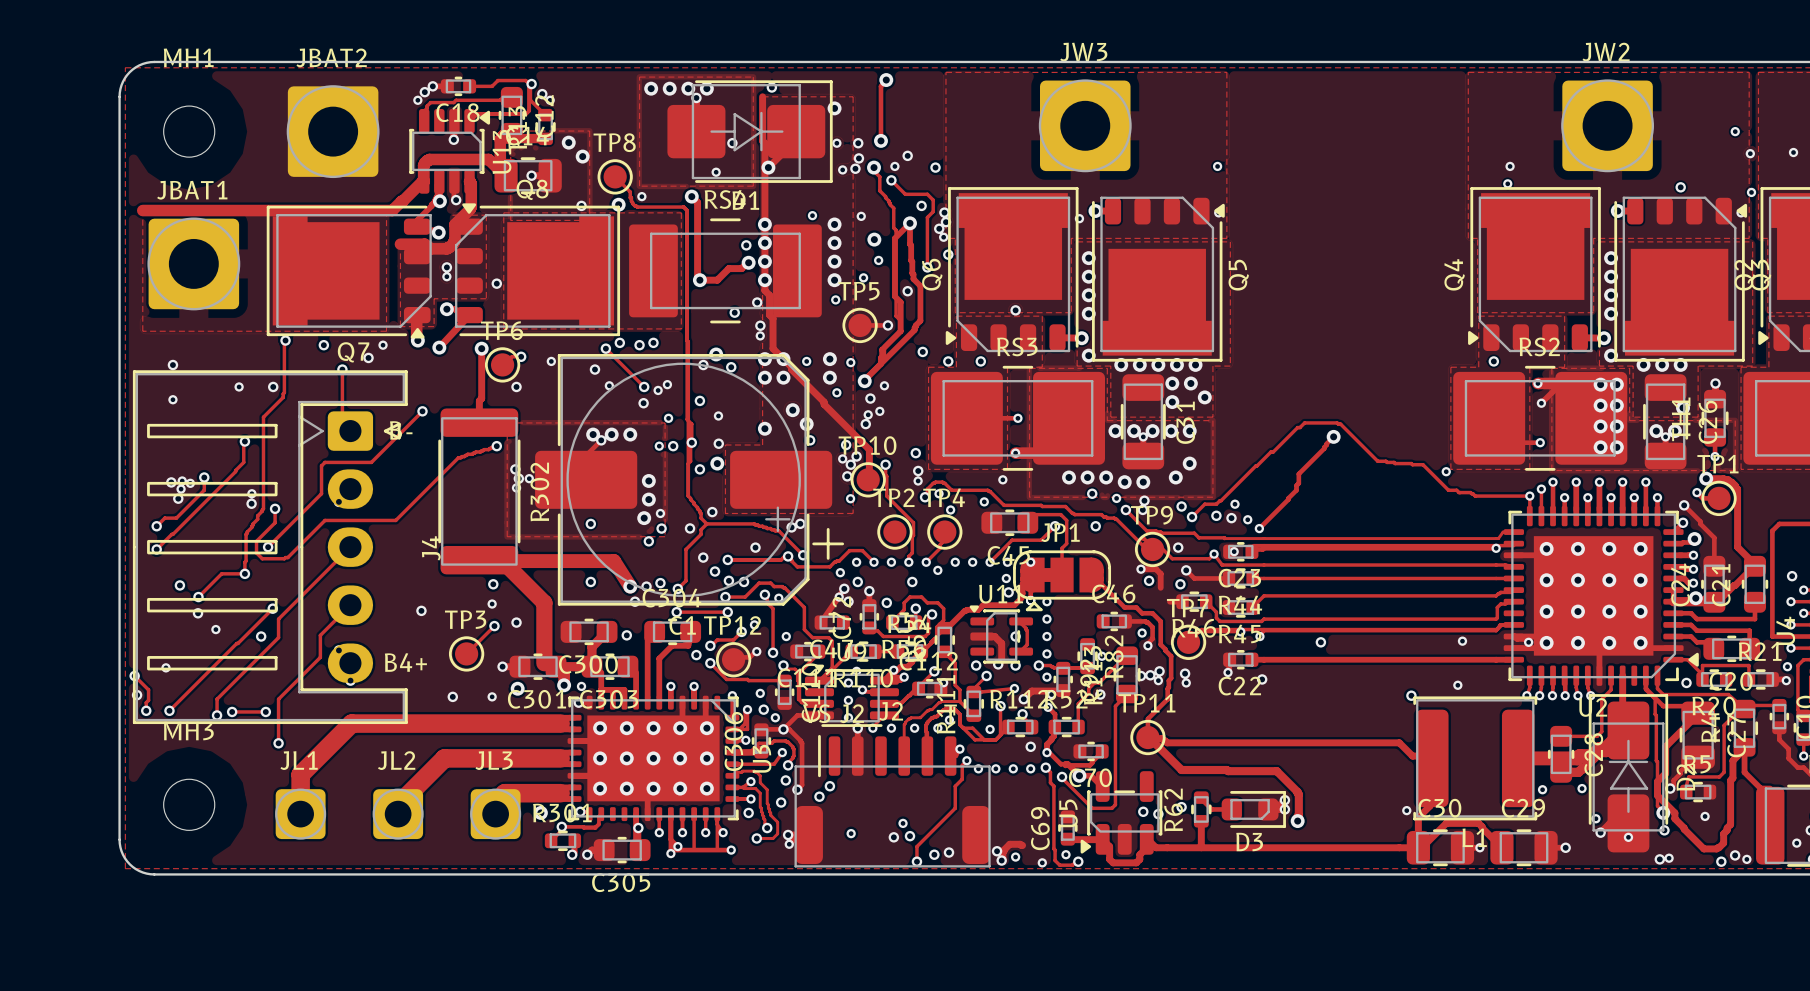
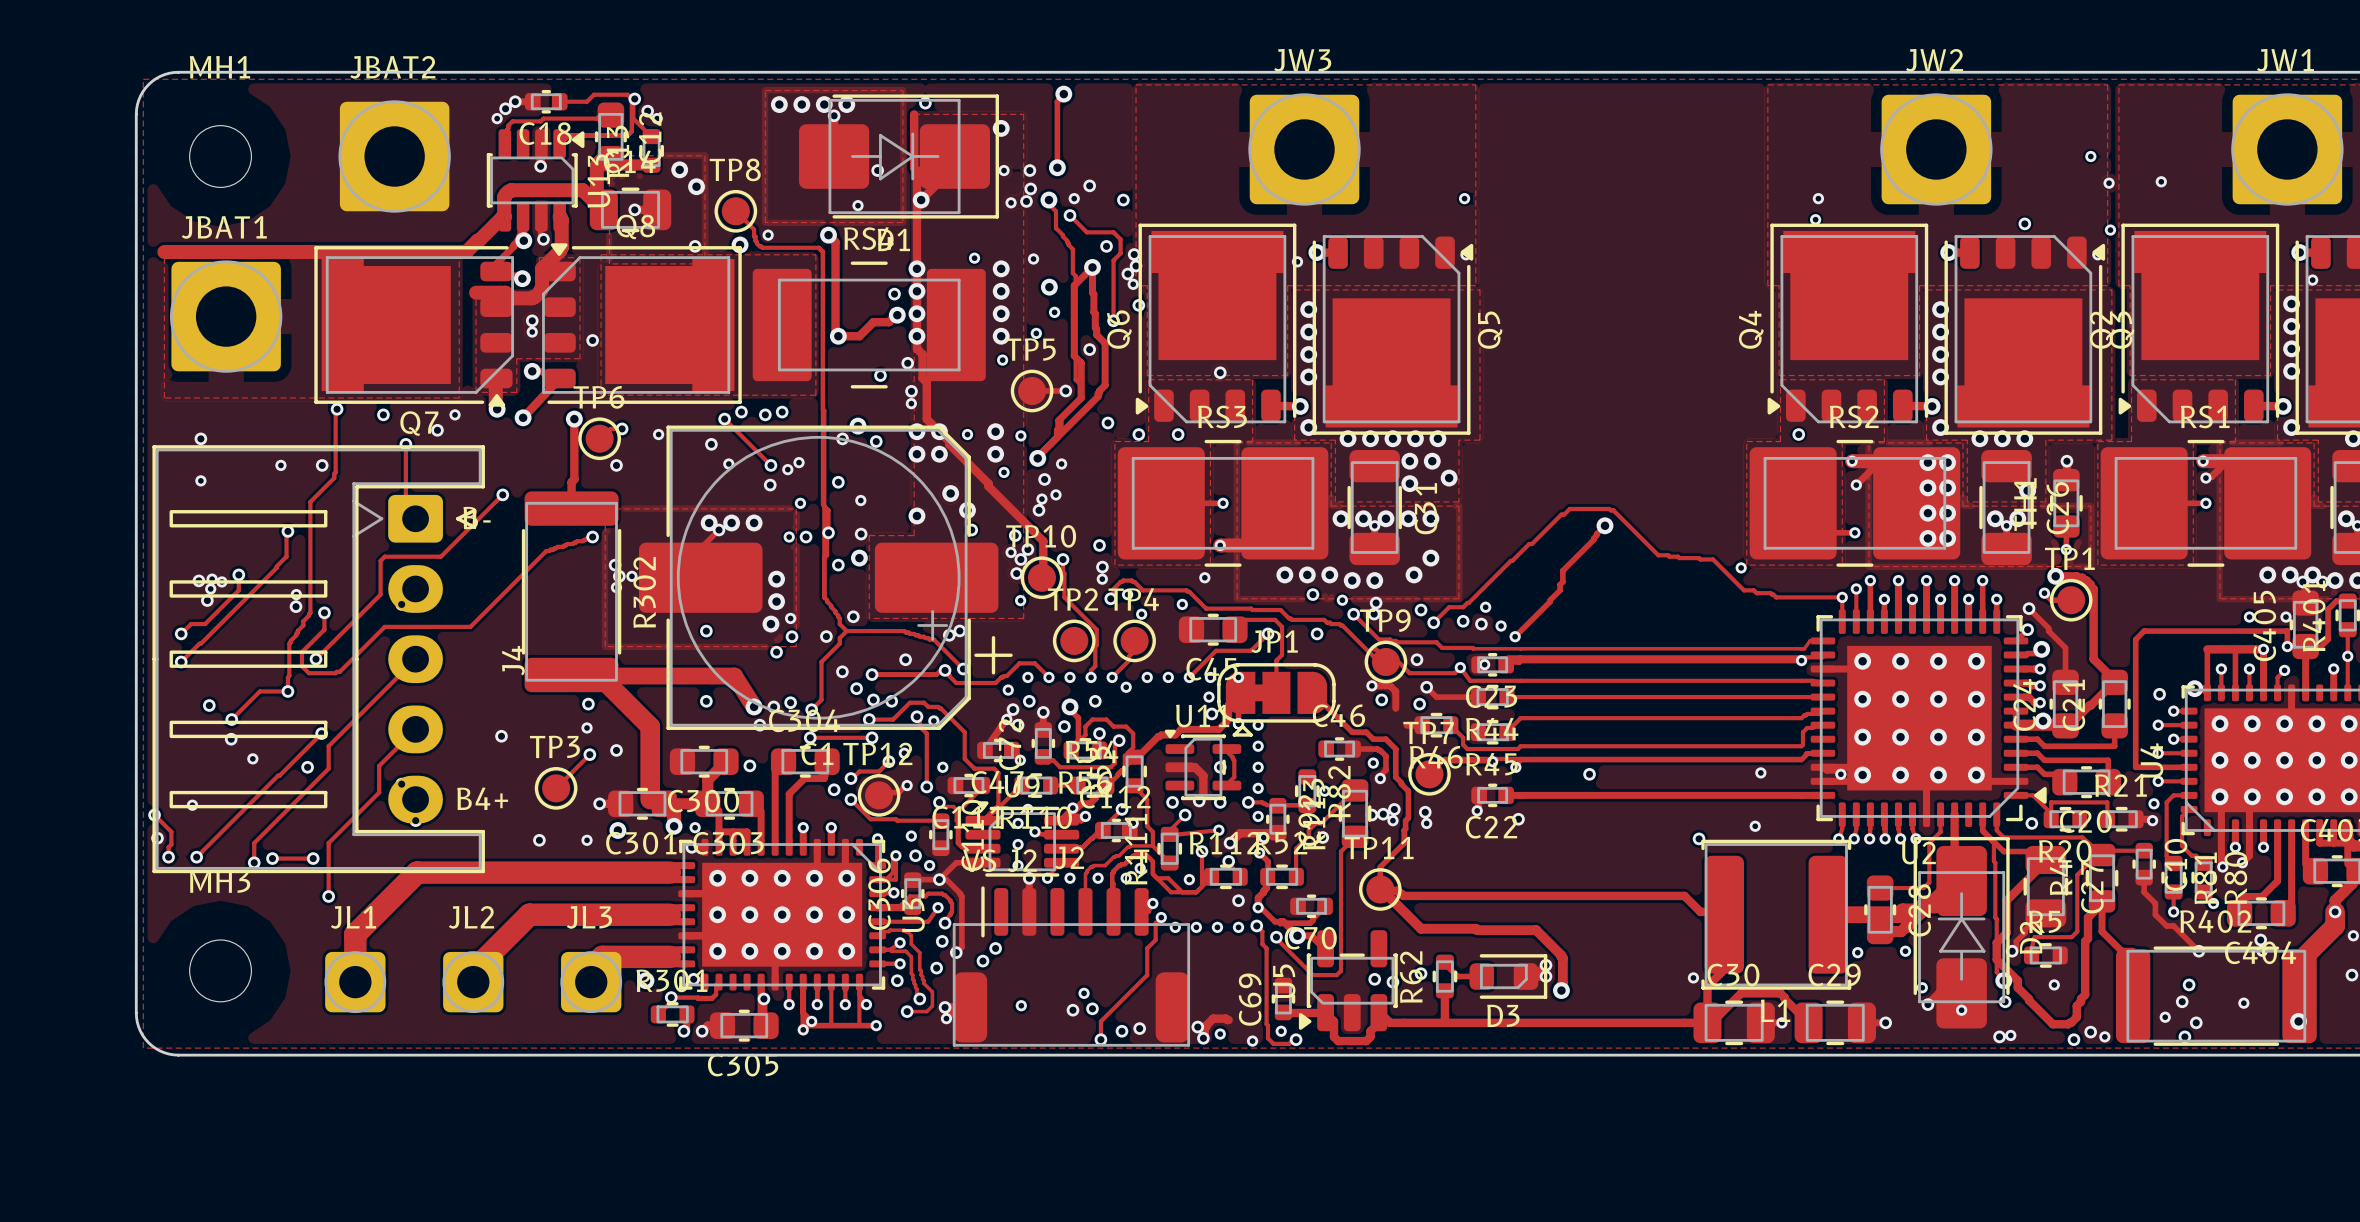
track: none -> (1070, 706) (1070, 709) (1078, 718) (1078, 740) (1071, 749)
via: none -> (1070, 706)
via: none -> (1020, 760)

